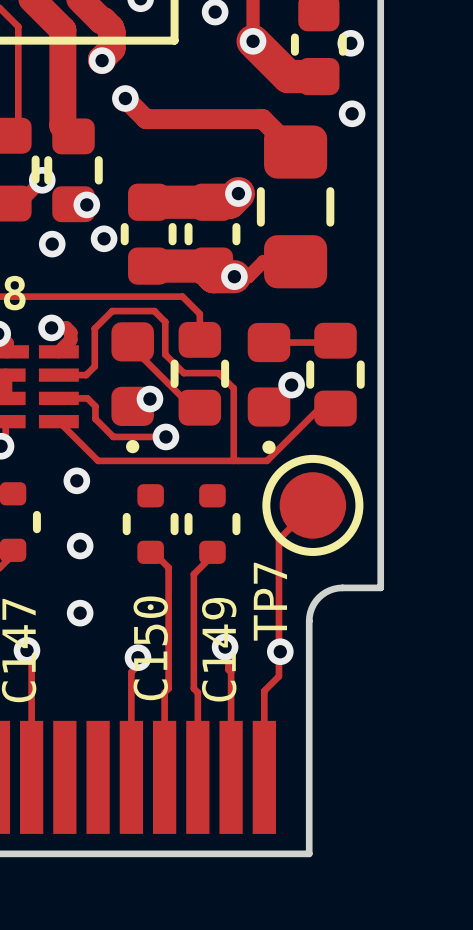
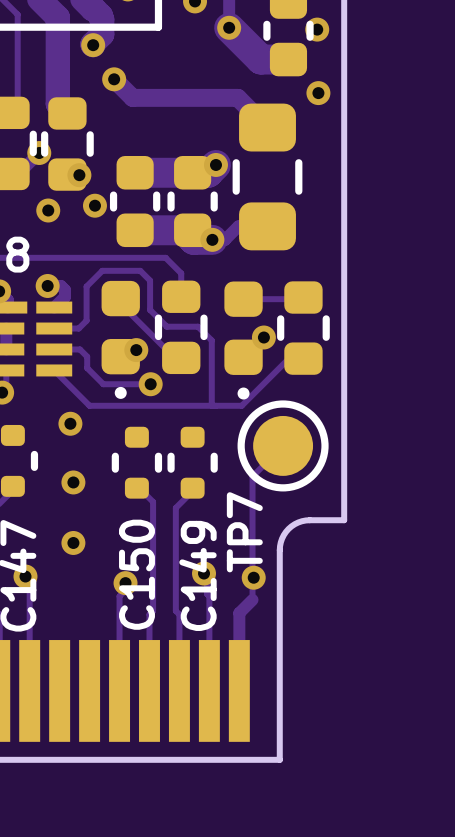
track width: thin (278, 676) (264, 690) (264, 777) -> thick (252, 599) (239, 613) (239, 690)

